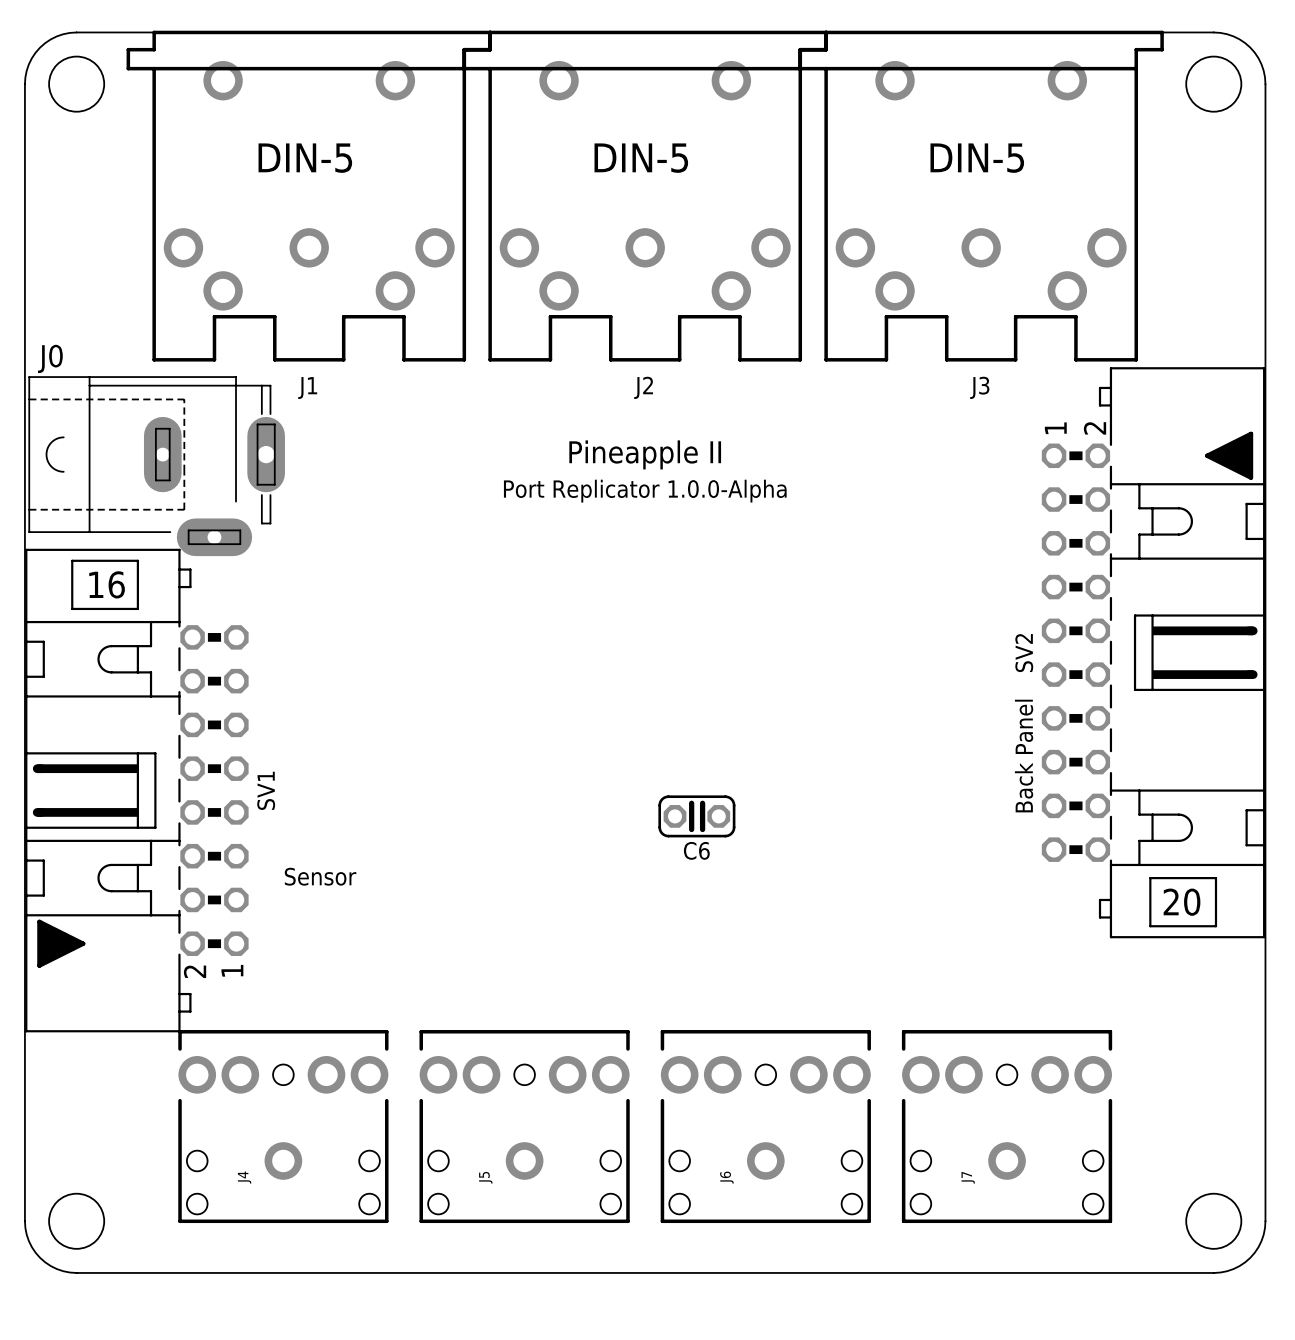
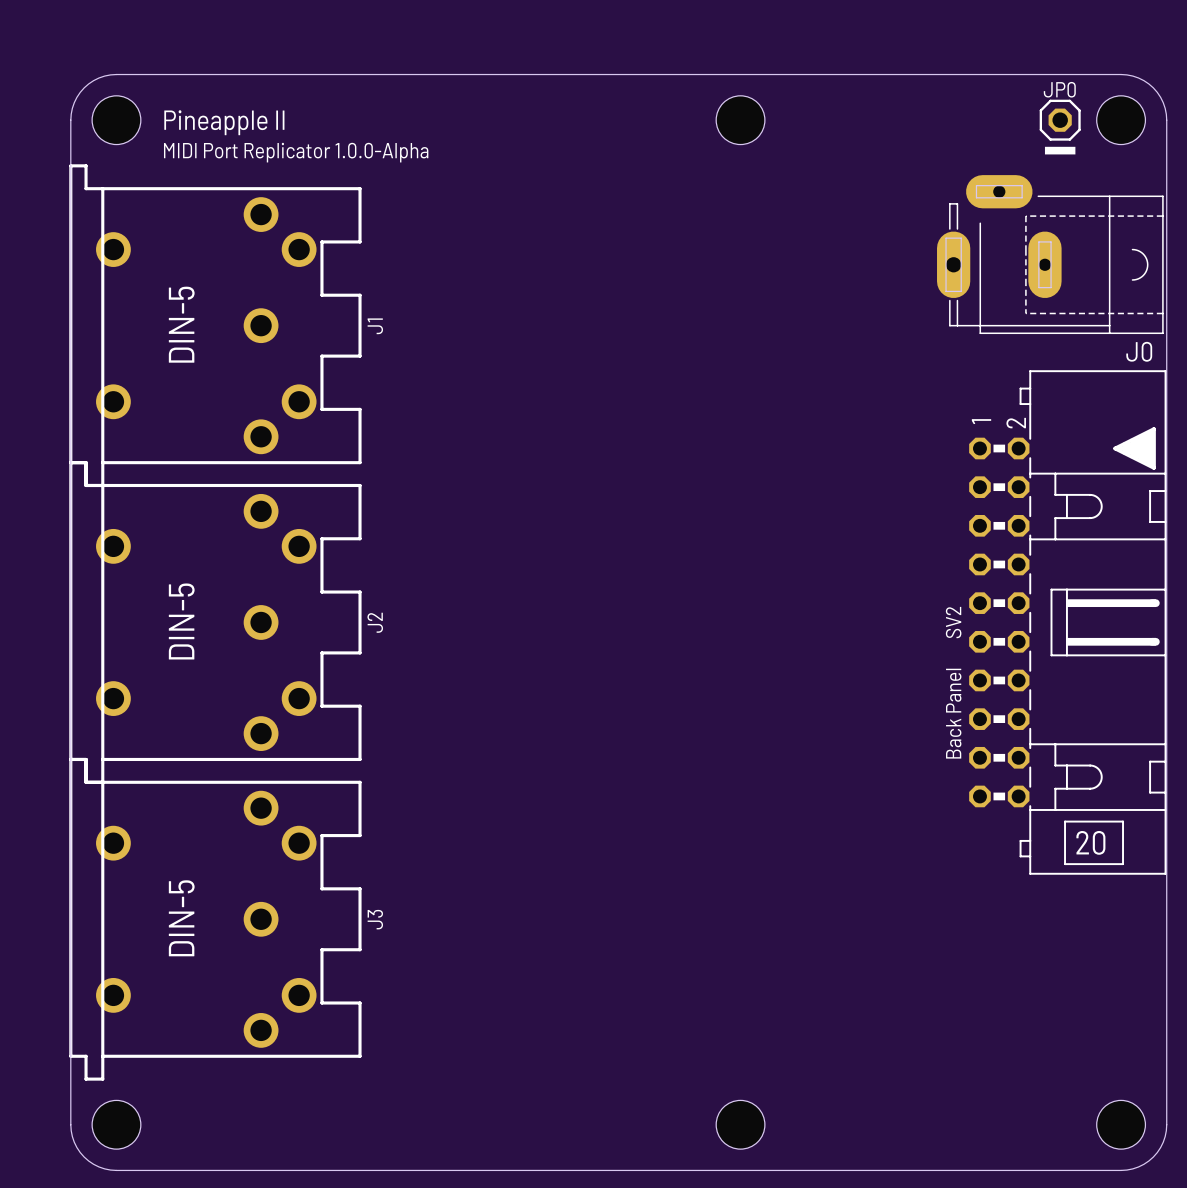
hole: none -> (740, 120)
JP0: none -> (1060, 120)
text: none -> Pineapple II (224, 122)
drawing: none -> [1044, 146, 1076, 155]
text: none -> MIDI Port Replicator 1.0.0-Alpha (296, 152)
J1 rotation: 0° (309, 196) -> 90° counterclockwise (215, 325)
J2 rotation: 0° (645, 196) -> 90° counterclockwise (215, 622)
J2 position: (645, 196) -> (215, 622)
J3 rotation: 0° (981, 196) -> 90° counterclockwise (215, 919)
J3 position: (981, 196) -> (215, 919)
text: Pineapple II (645, 454) -> none
J0 rotation: 0° (156, 466) -> 180° (1050, 254)
J0 position: (156, 466) -> (1050, 254)
text: Port Replicator 1.0.0-Alpha (645, 491) -> none
SV1: (136, 790) -> none
C6: (696, 816) -> none
text: Sensor (320, 876) -> none
J4: (283, 1126) -> none
J5: (524, 1126) -> none
J6: (765, 1126) -> none
J7: (1007, 1126) -> none
hole: none -> (740, 1124)

